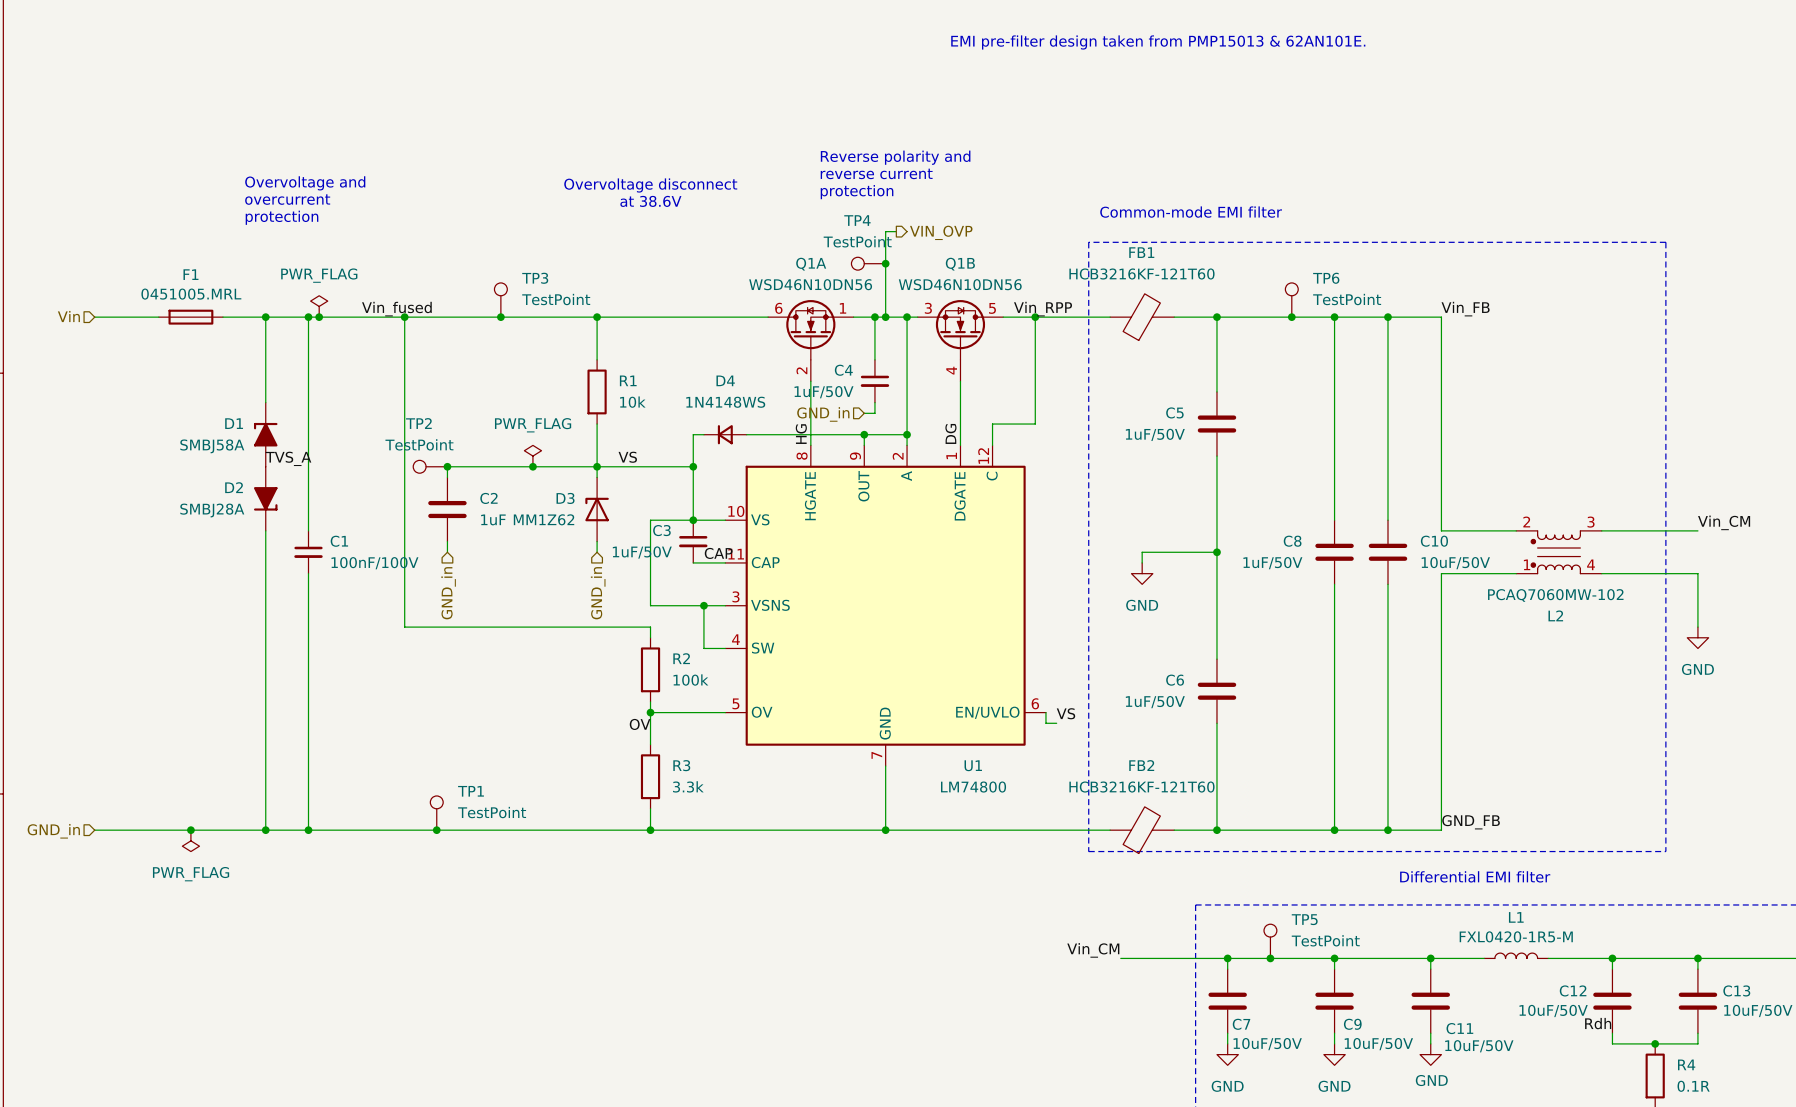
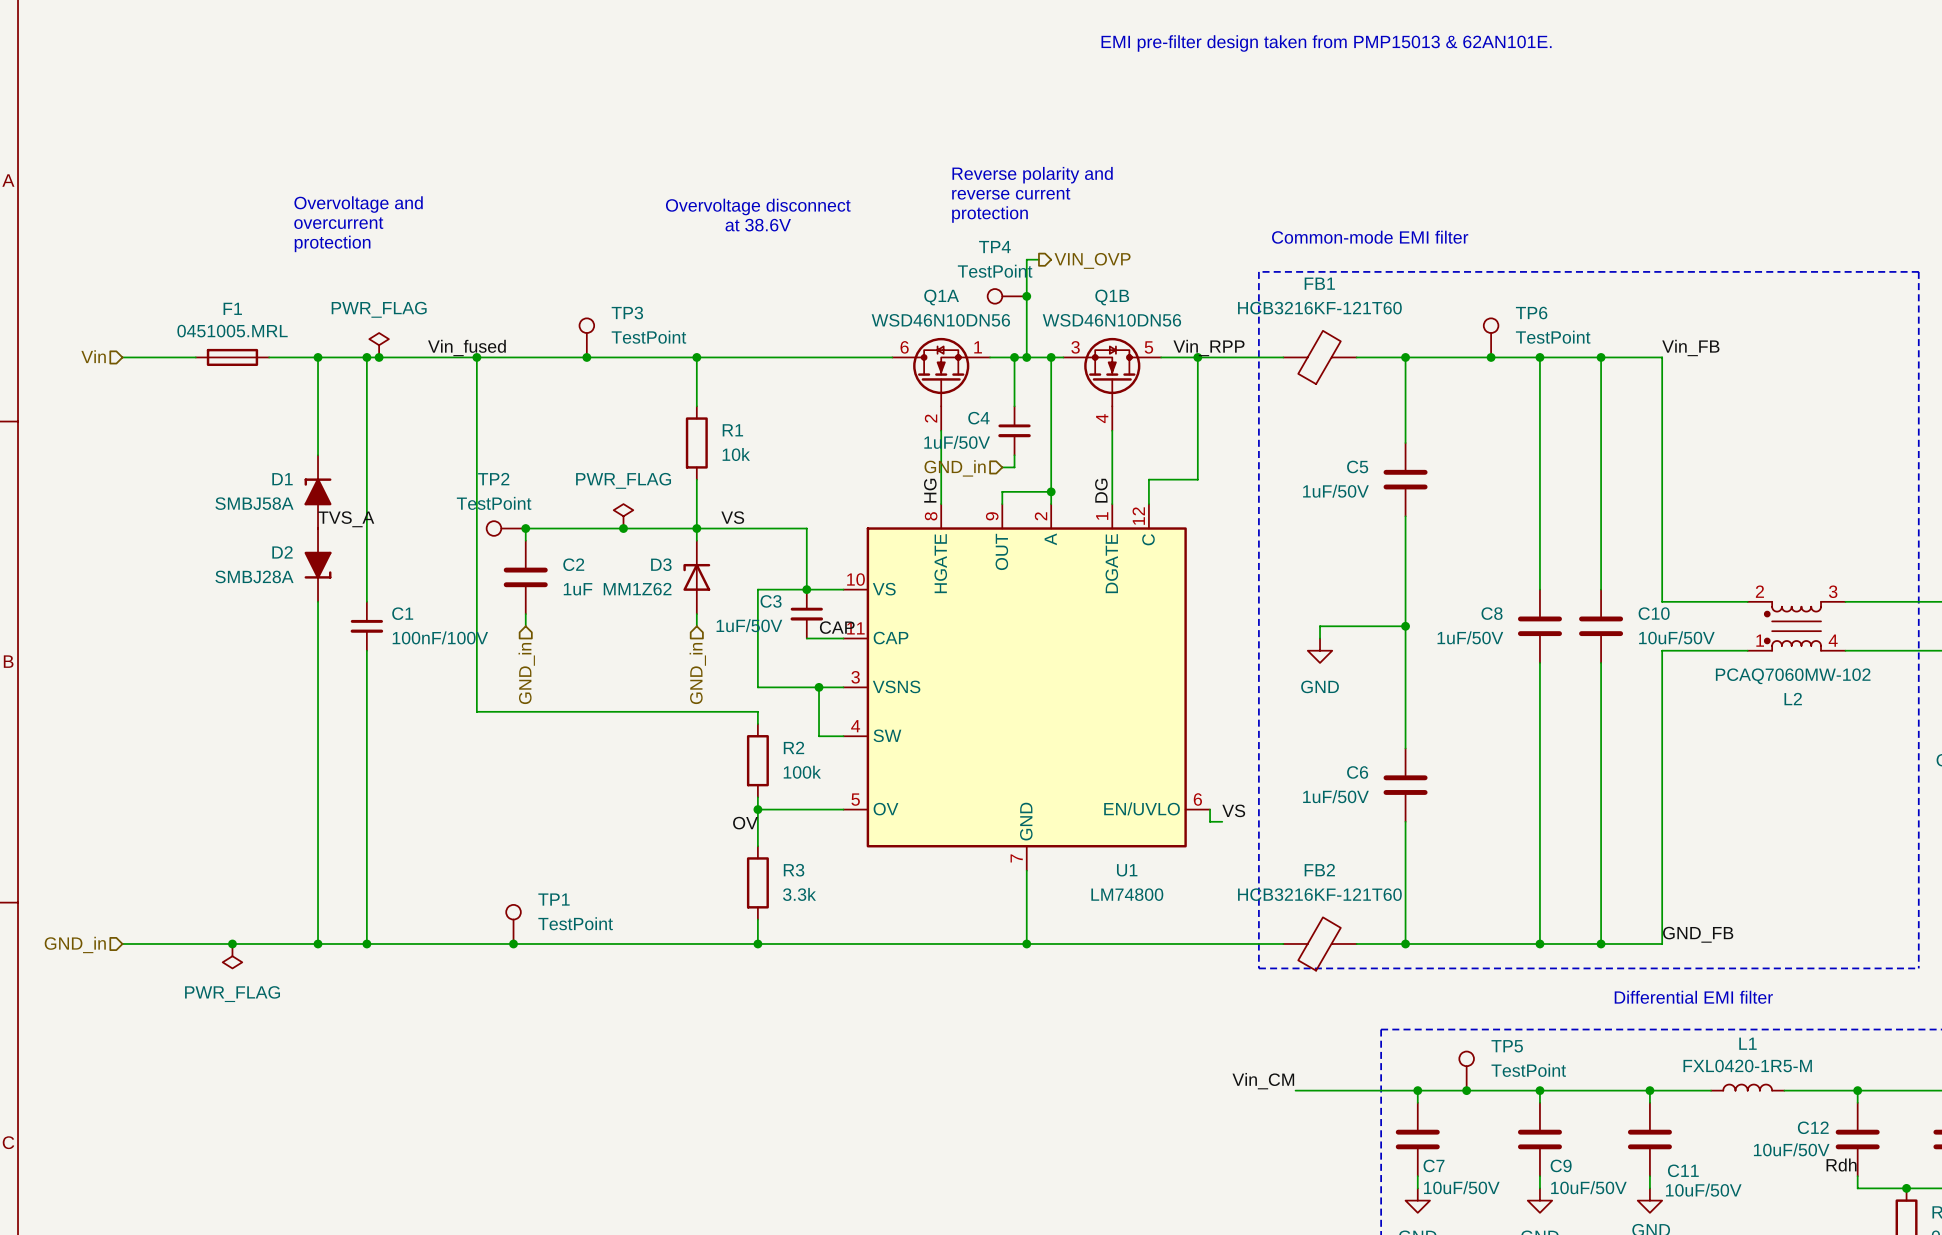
wire: (703, 434) (693, 434) (693, 466) -> none
D4: 1N4148WS (725, 434) -> none
wire: (746, 434) (864, 434) -> none
junction: (864, 434) -> none
junction: (693, 466) -> none

